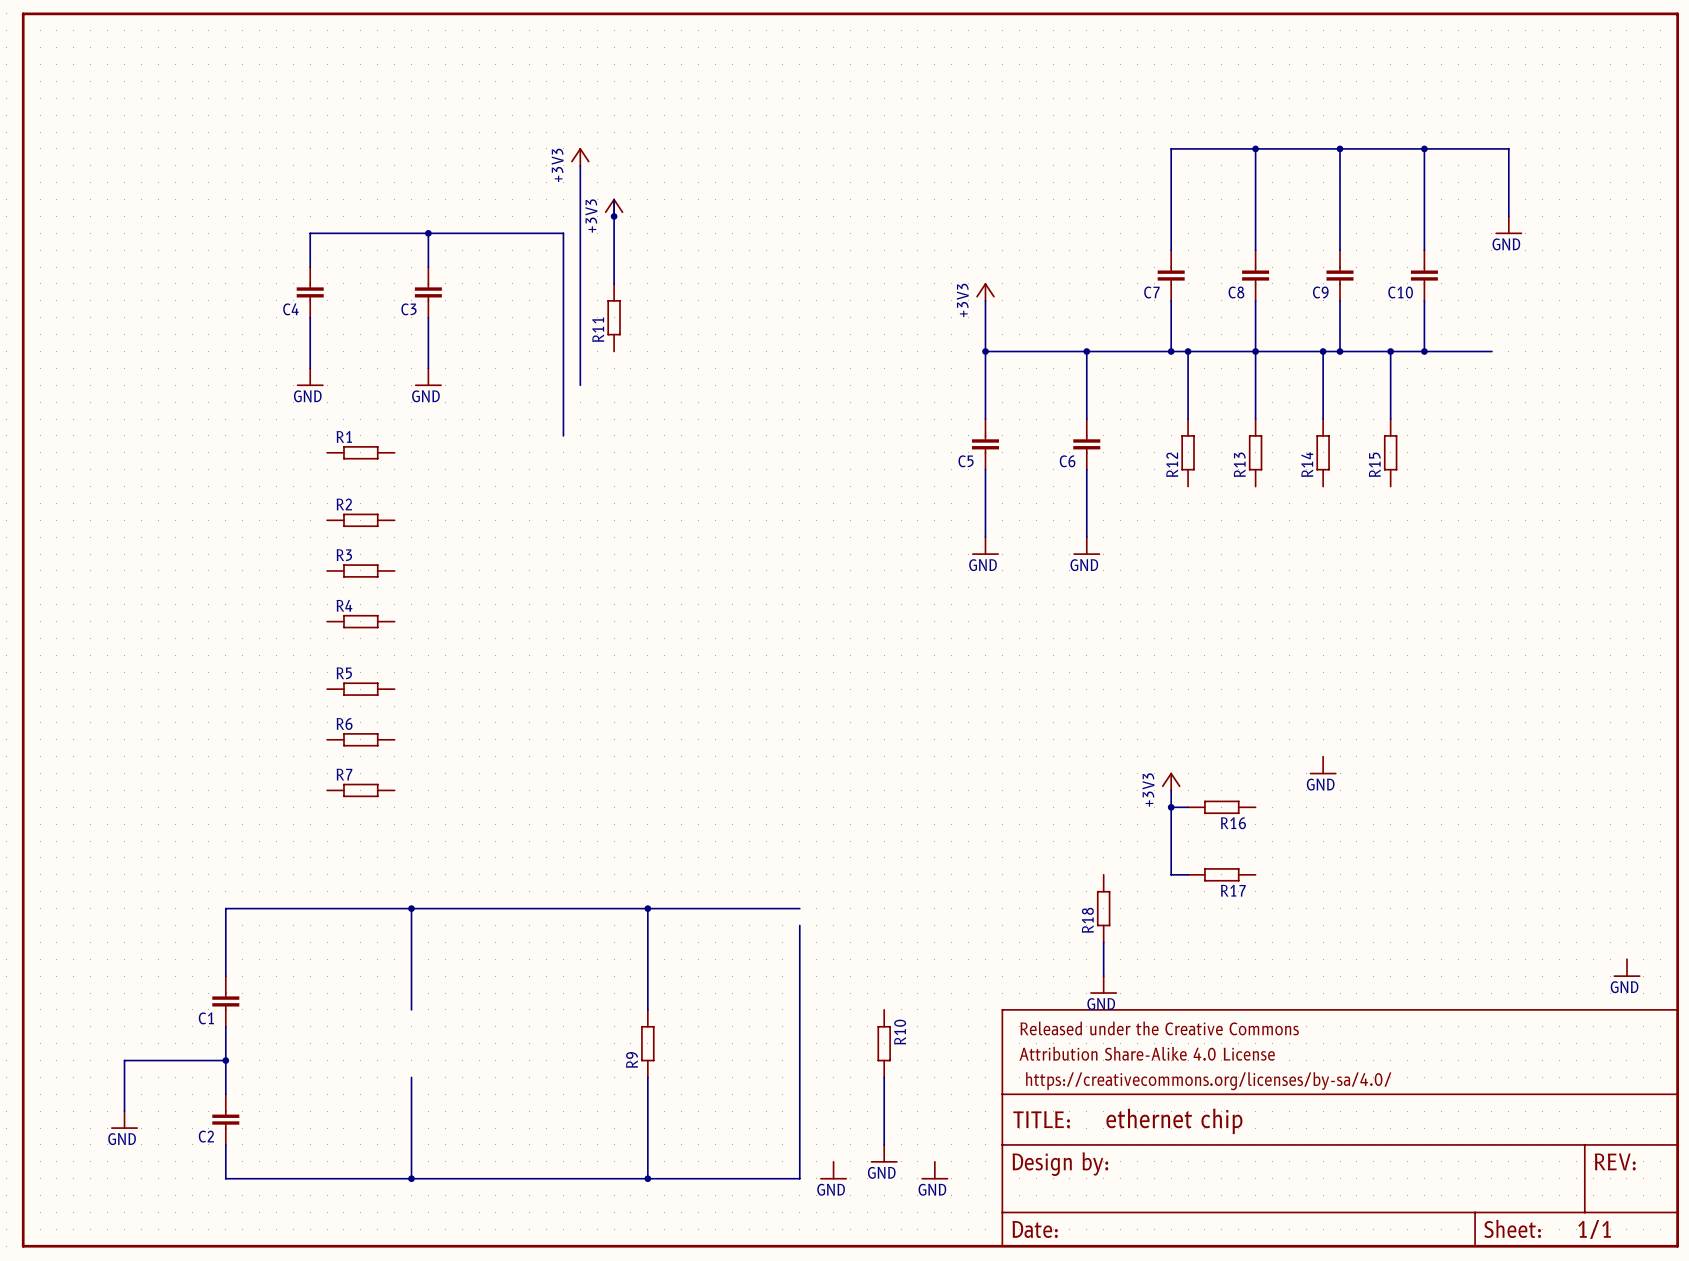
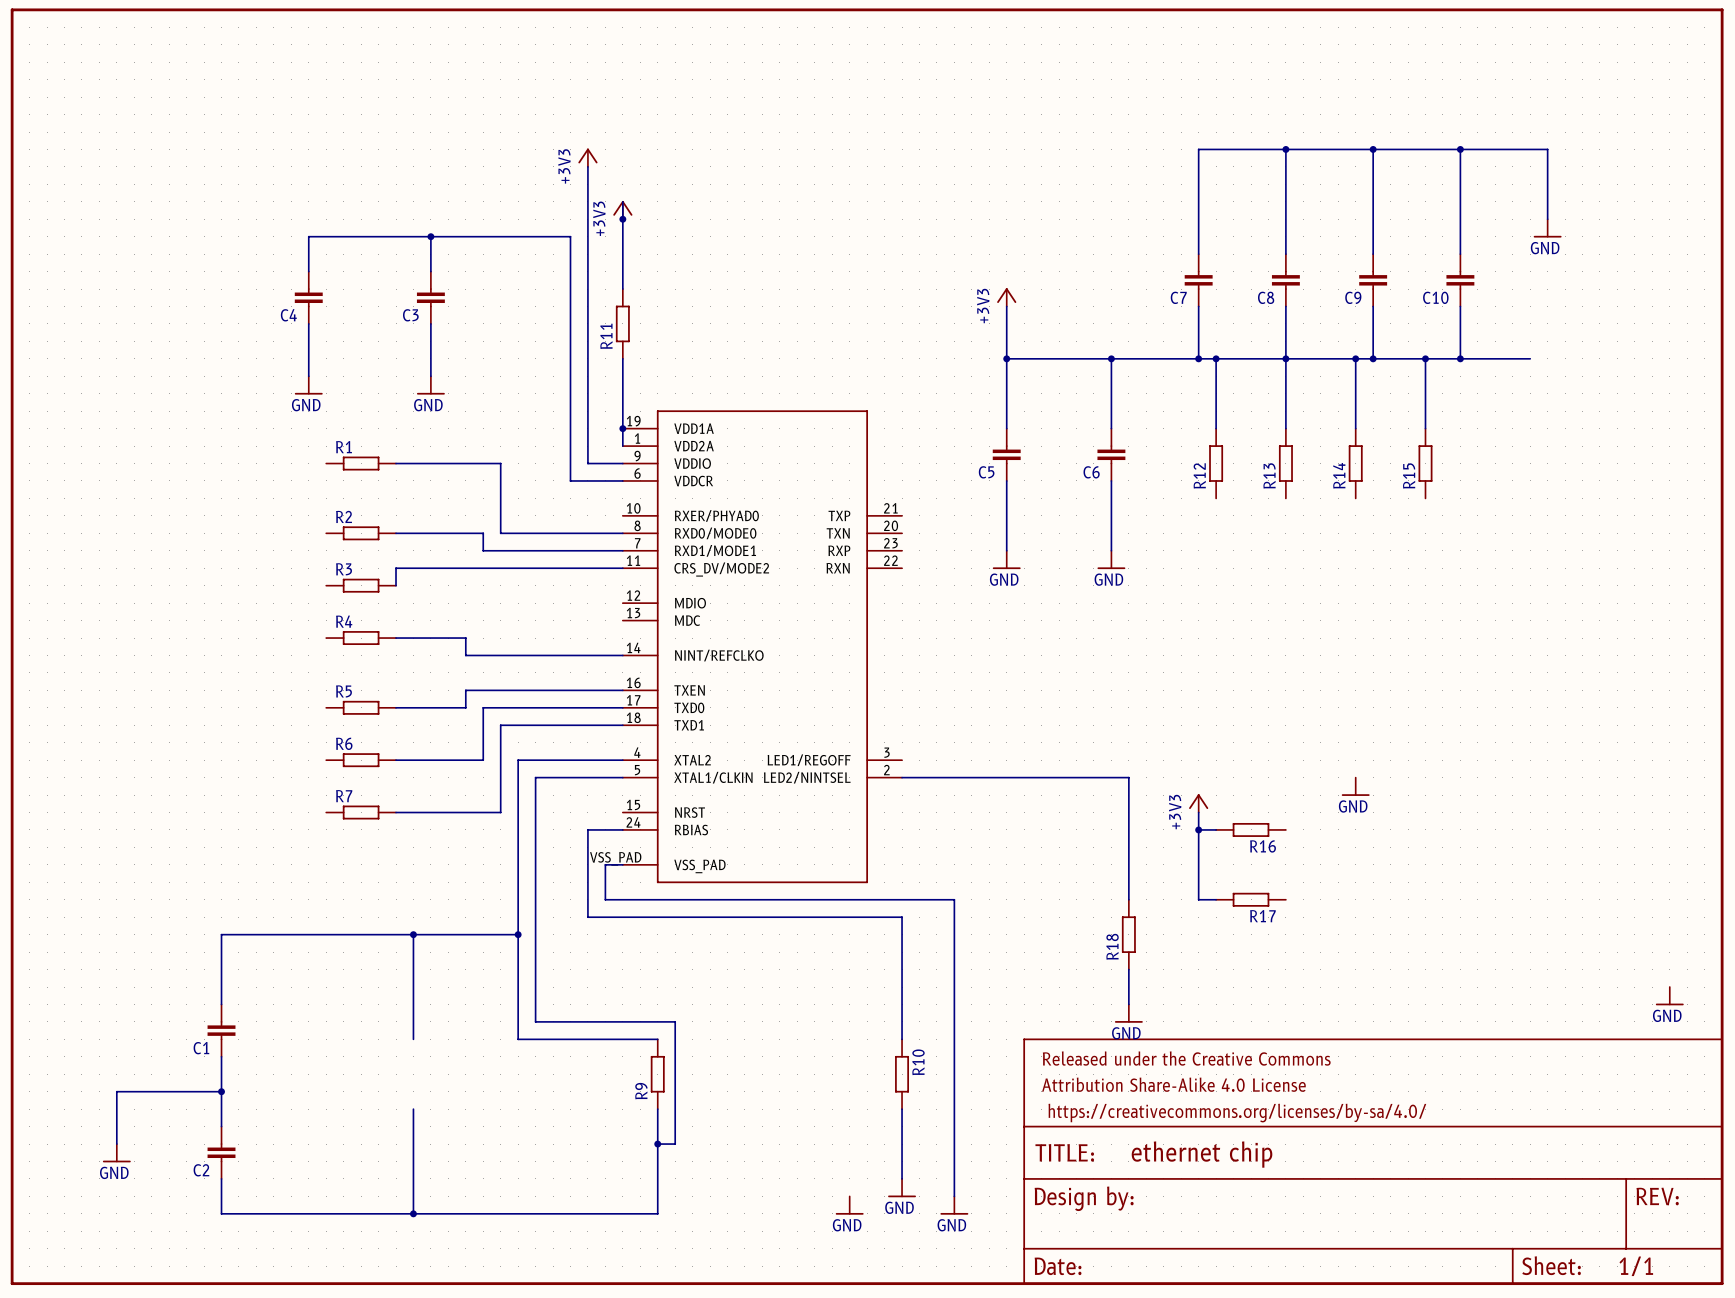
wire: none -> (622, 358) (622, 446)
wire: none -> (587, 393) (587, 463) (622, 463)
junction: none -> (622, 428)
wire: none -> (570, 446) (570, 480) (622, 480)
wire: none -> (396, 463) (500, 463) (500, 533) (622, 533)
wire: none -> (396, 533) (483, 533) (483, 550) (622, 550)
wire: none -> (622, 568) (396, 568) (396, 585)
wire: none -> (396, 638) (465, 638) (465, 655) (622, 655)
part: none -> (762, 646)
wire: none -> (622, 690) (465, 690) (465, 707) (396, 707)
wire: none -> (622, 707) (483, 707) (483, 760) (396, 760)
wire: none -> (622, 725) (500, 725) (500, 812) (396, 812)
wire: none -> (622, 777) (535, 777) (535, 1021) (675, 1021) (675, 1144) (657, 1144)
wire: none -> (902, 777) (1128, 777) (1128, 899)
wire: none -> (622, 829) (587, 829) (587, 917) (902, 917) (902, 1039)
wire: none -> (622, 864) (605, 864) (605, 899) (954, 899) (954, 1196)
wire: (512, 908) (799, 908) -> none
junction: none -> (518, 934)
wire: (647, 908) (647, 1009) -> (622, 760) (518, 760) (518, 1039) (657, 1039)
junction: (647, 908) -> none
wire: (799, 925) (799, 1178) (647, 1178) -> none
junction: none -> (657, 1144)
junction: (647, 1178) -> none

